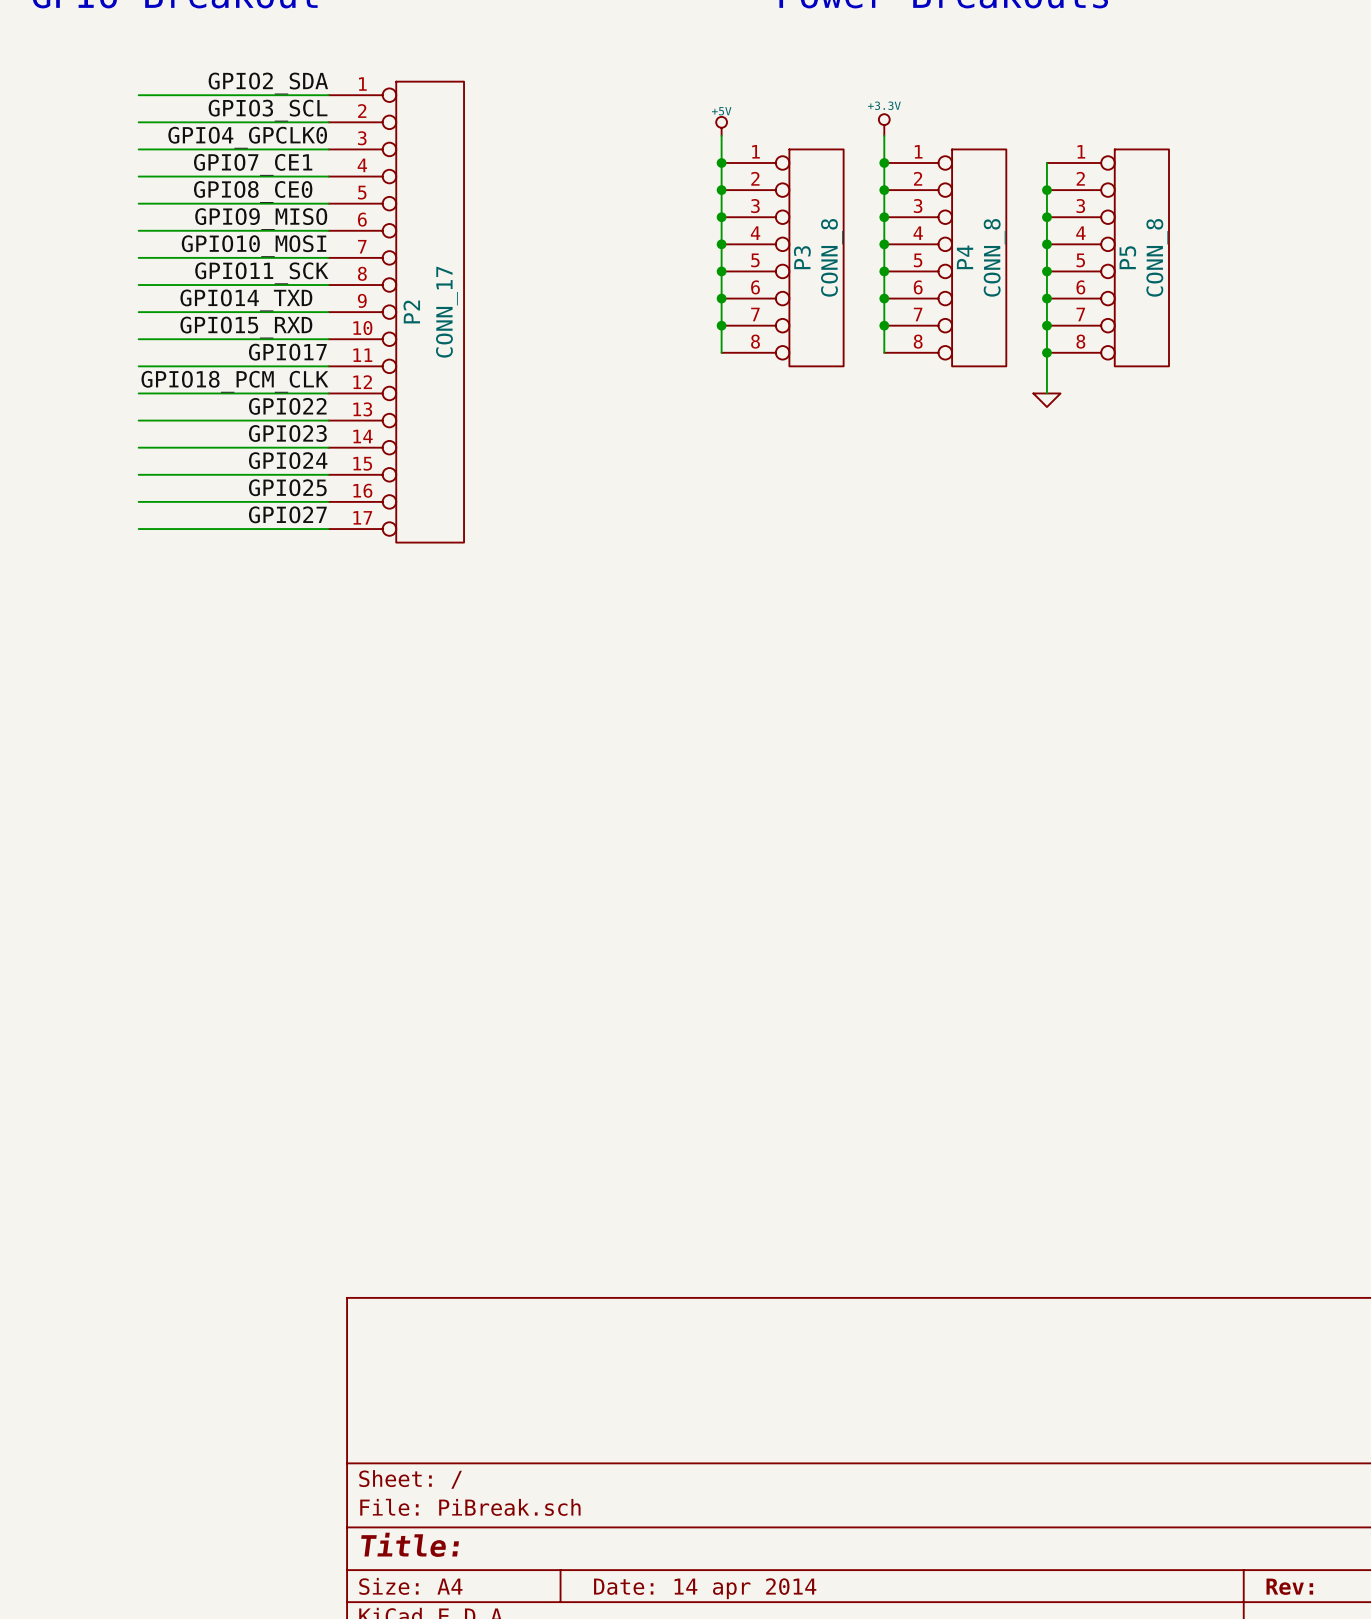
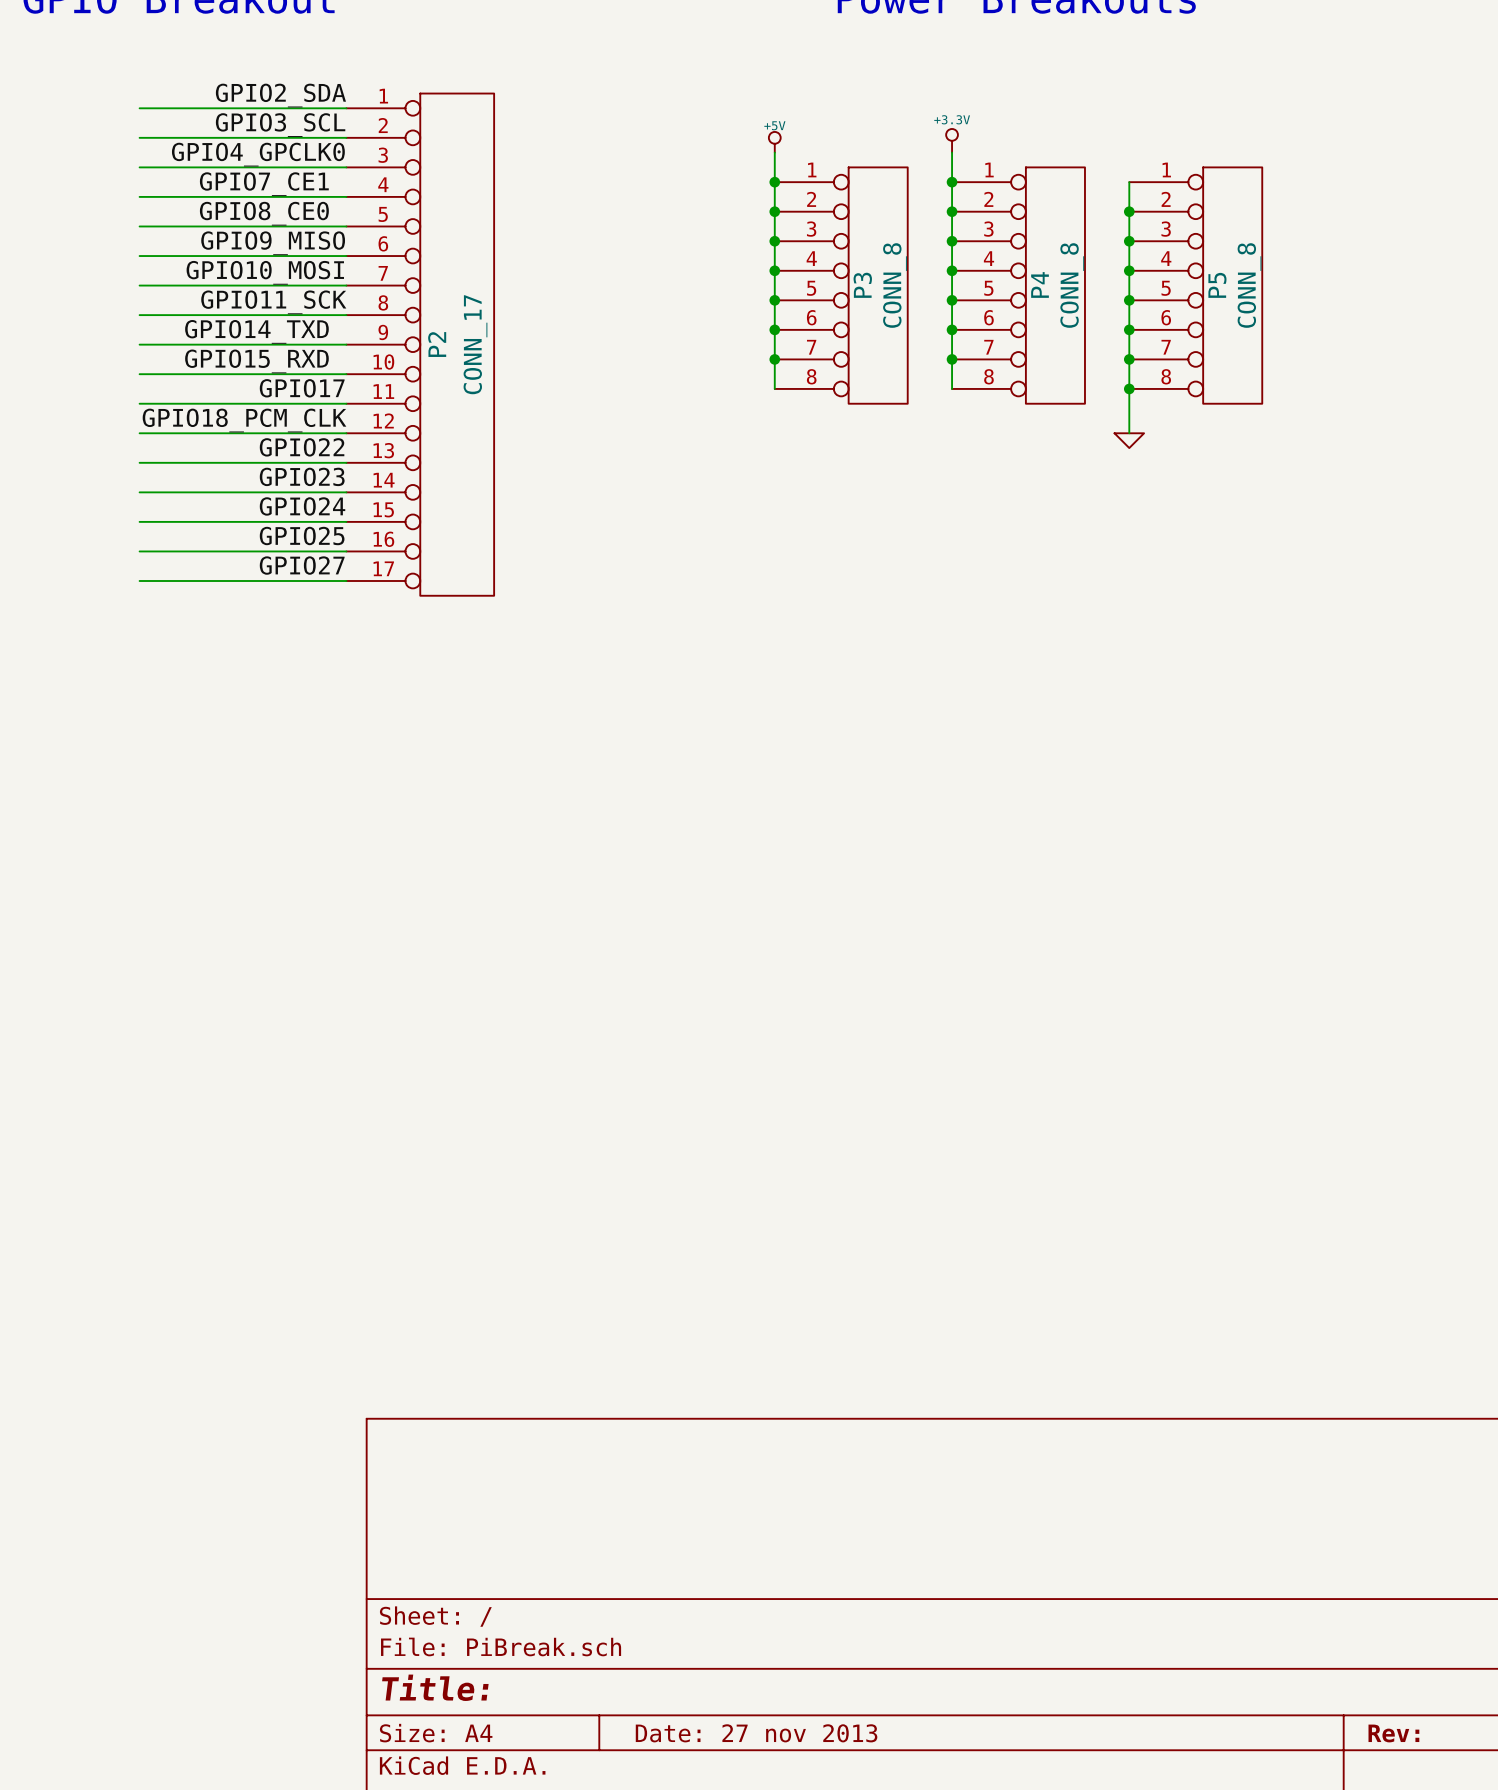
title block: Date: 14 apr 2014 (705, 1588) -> Date: 27 nov 2013 (756, 1733)

